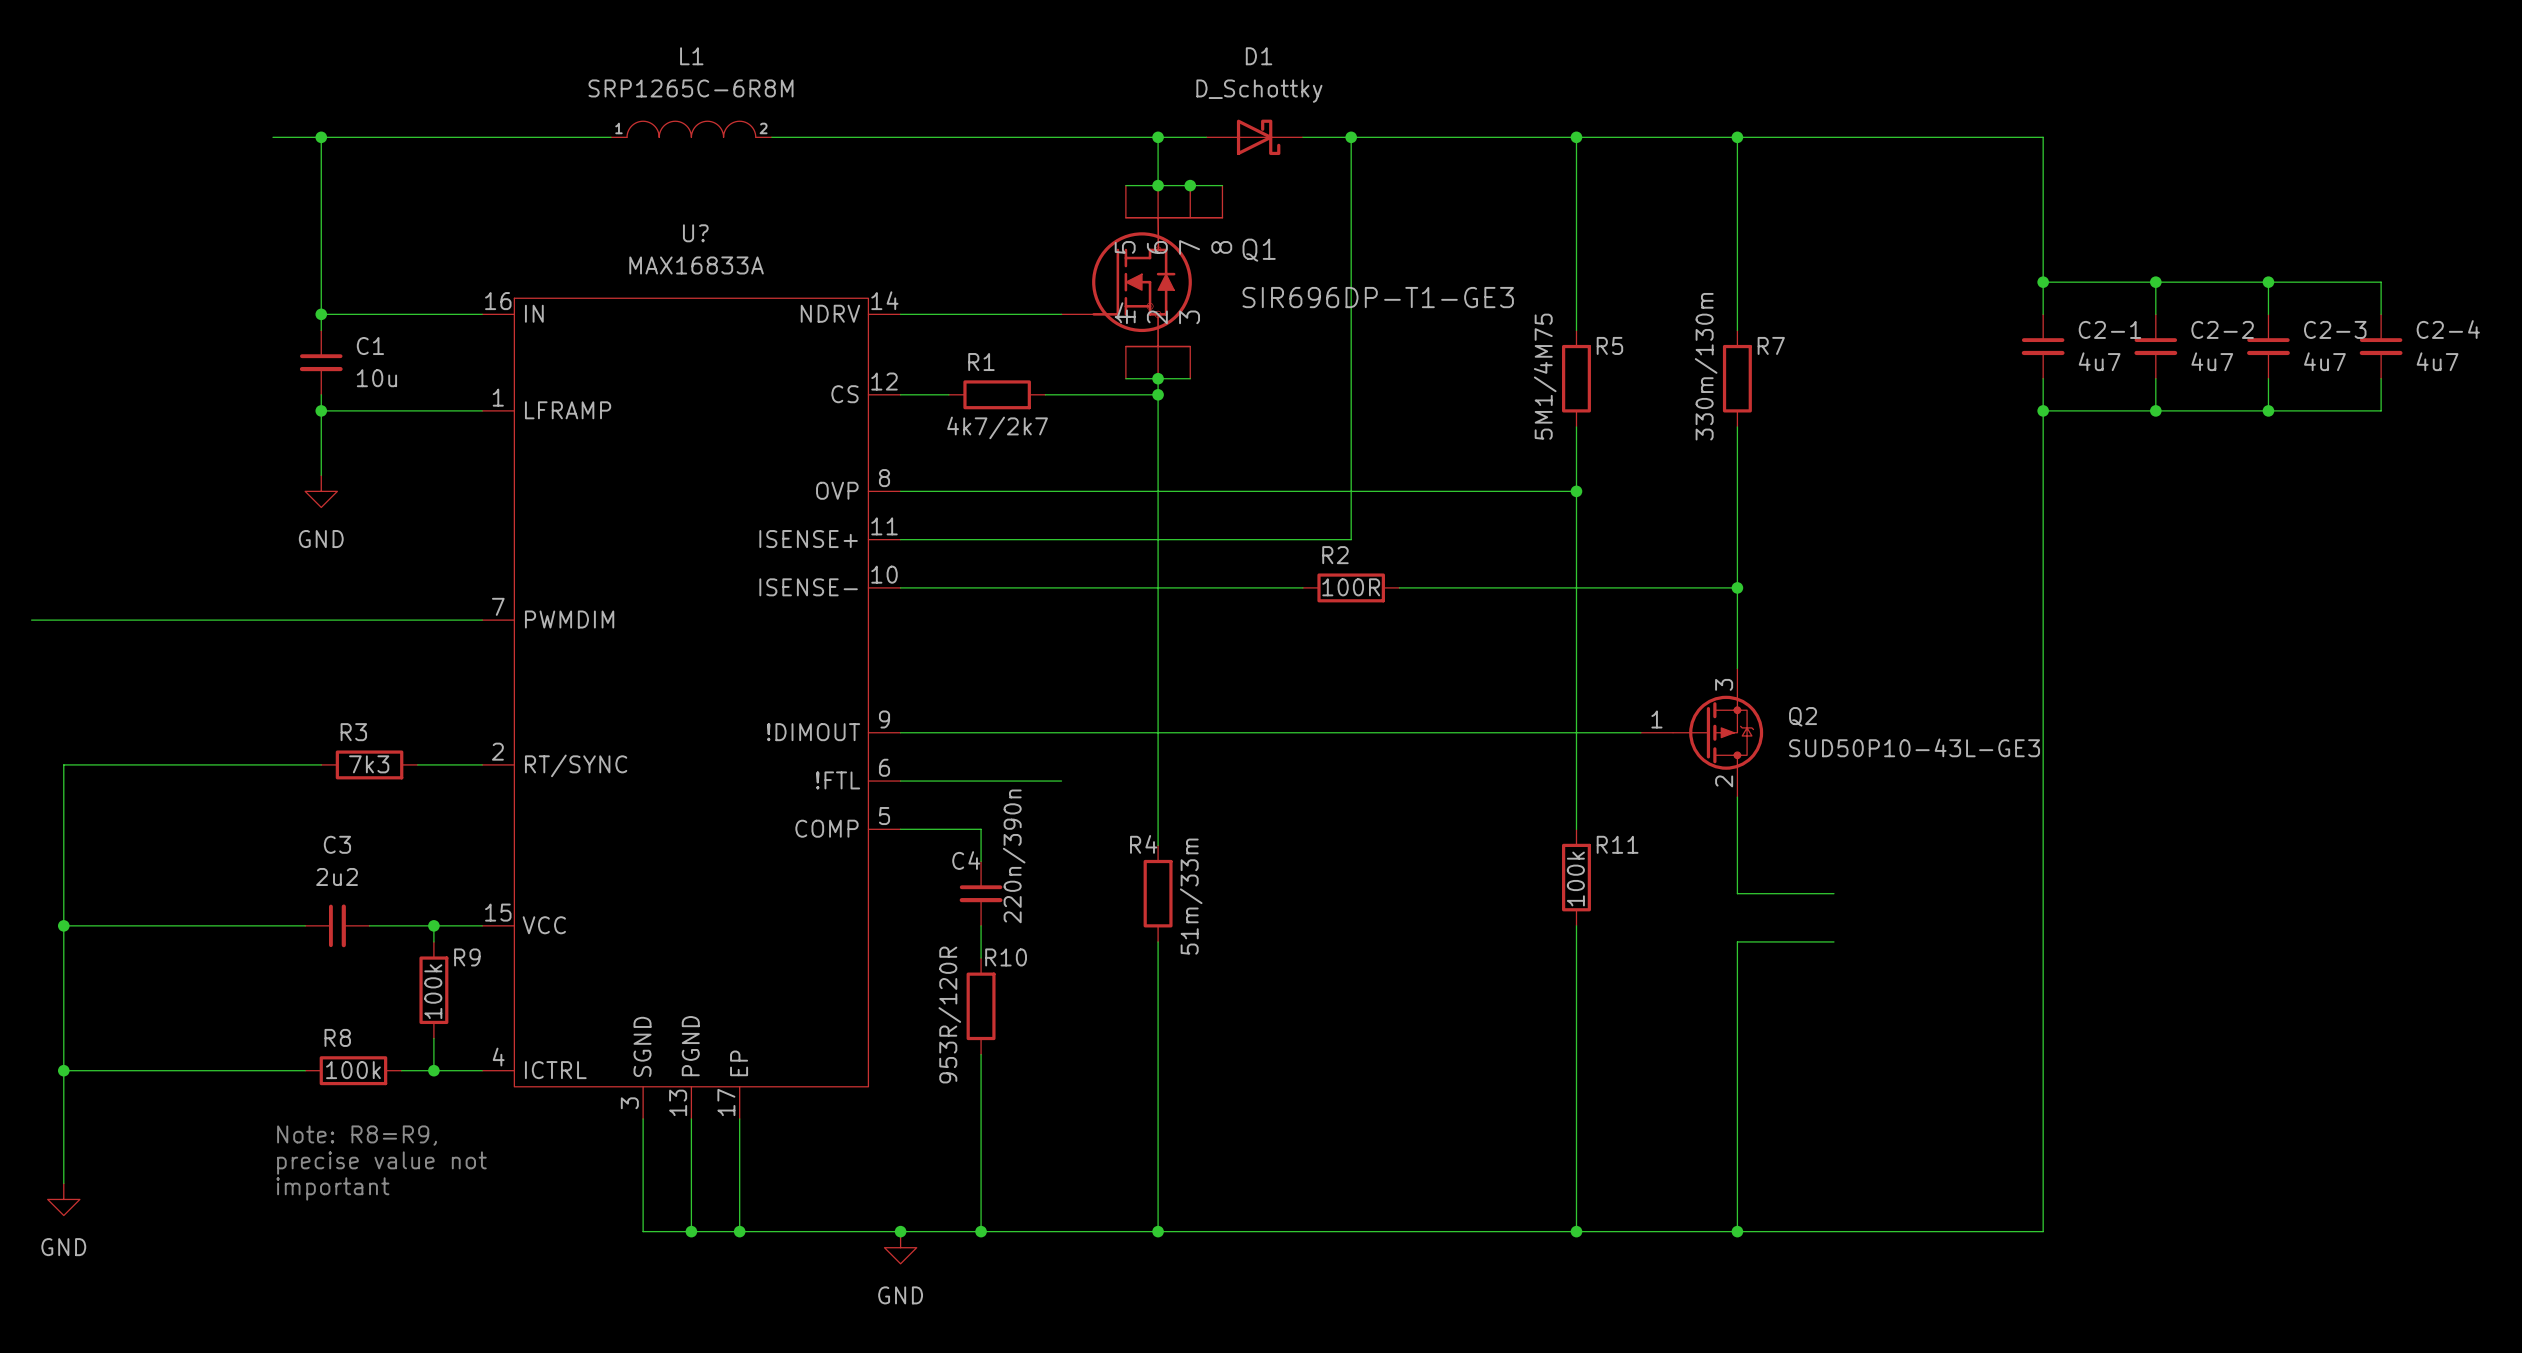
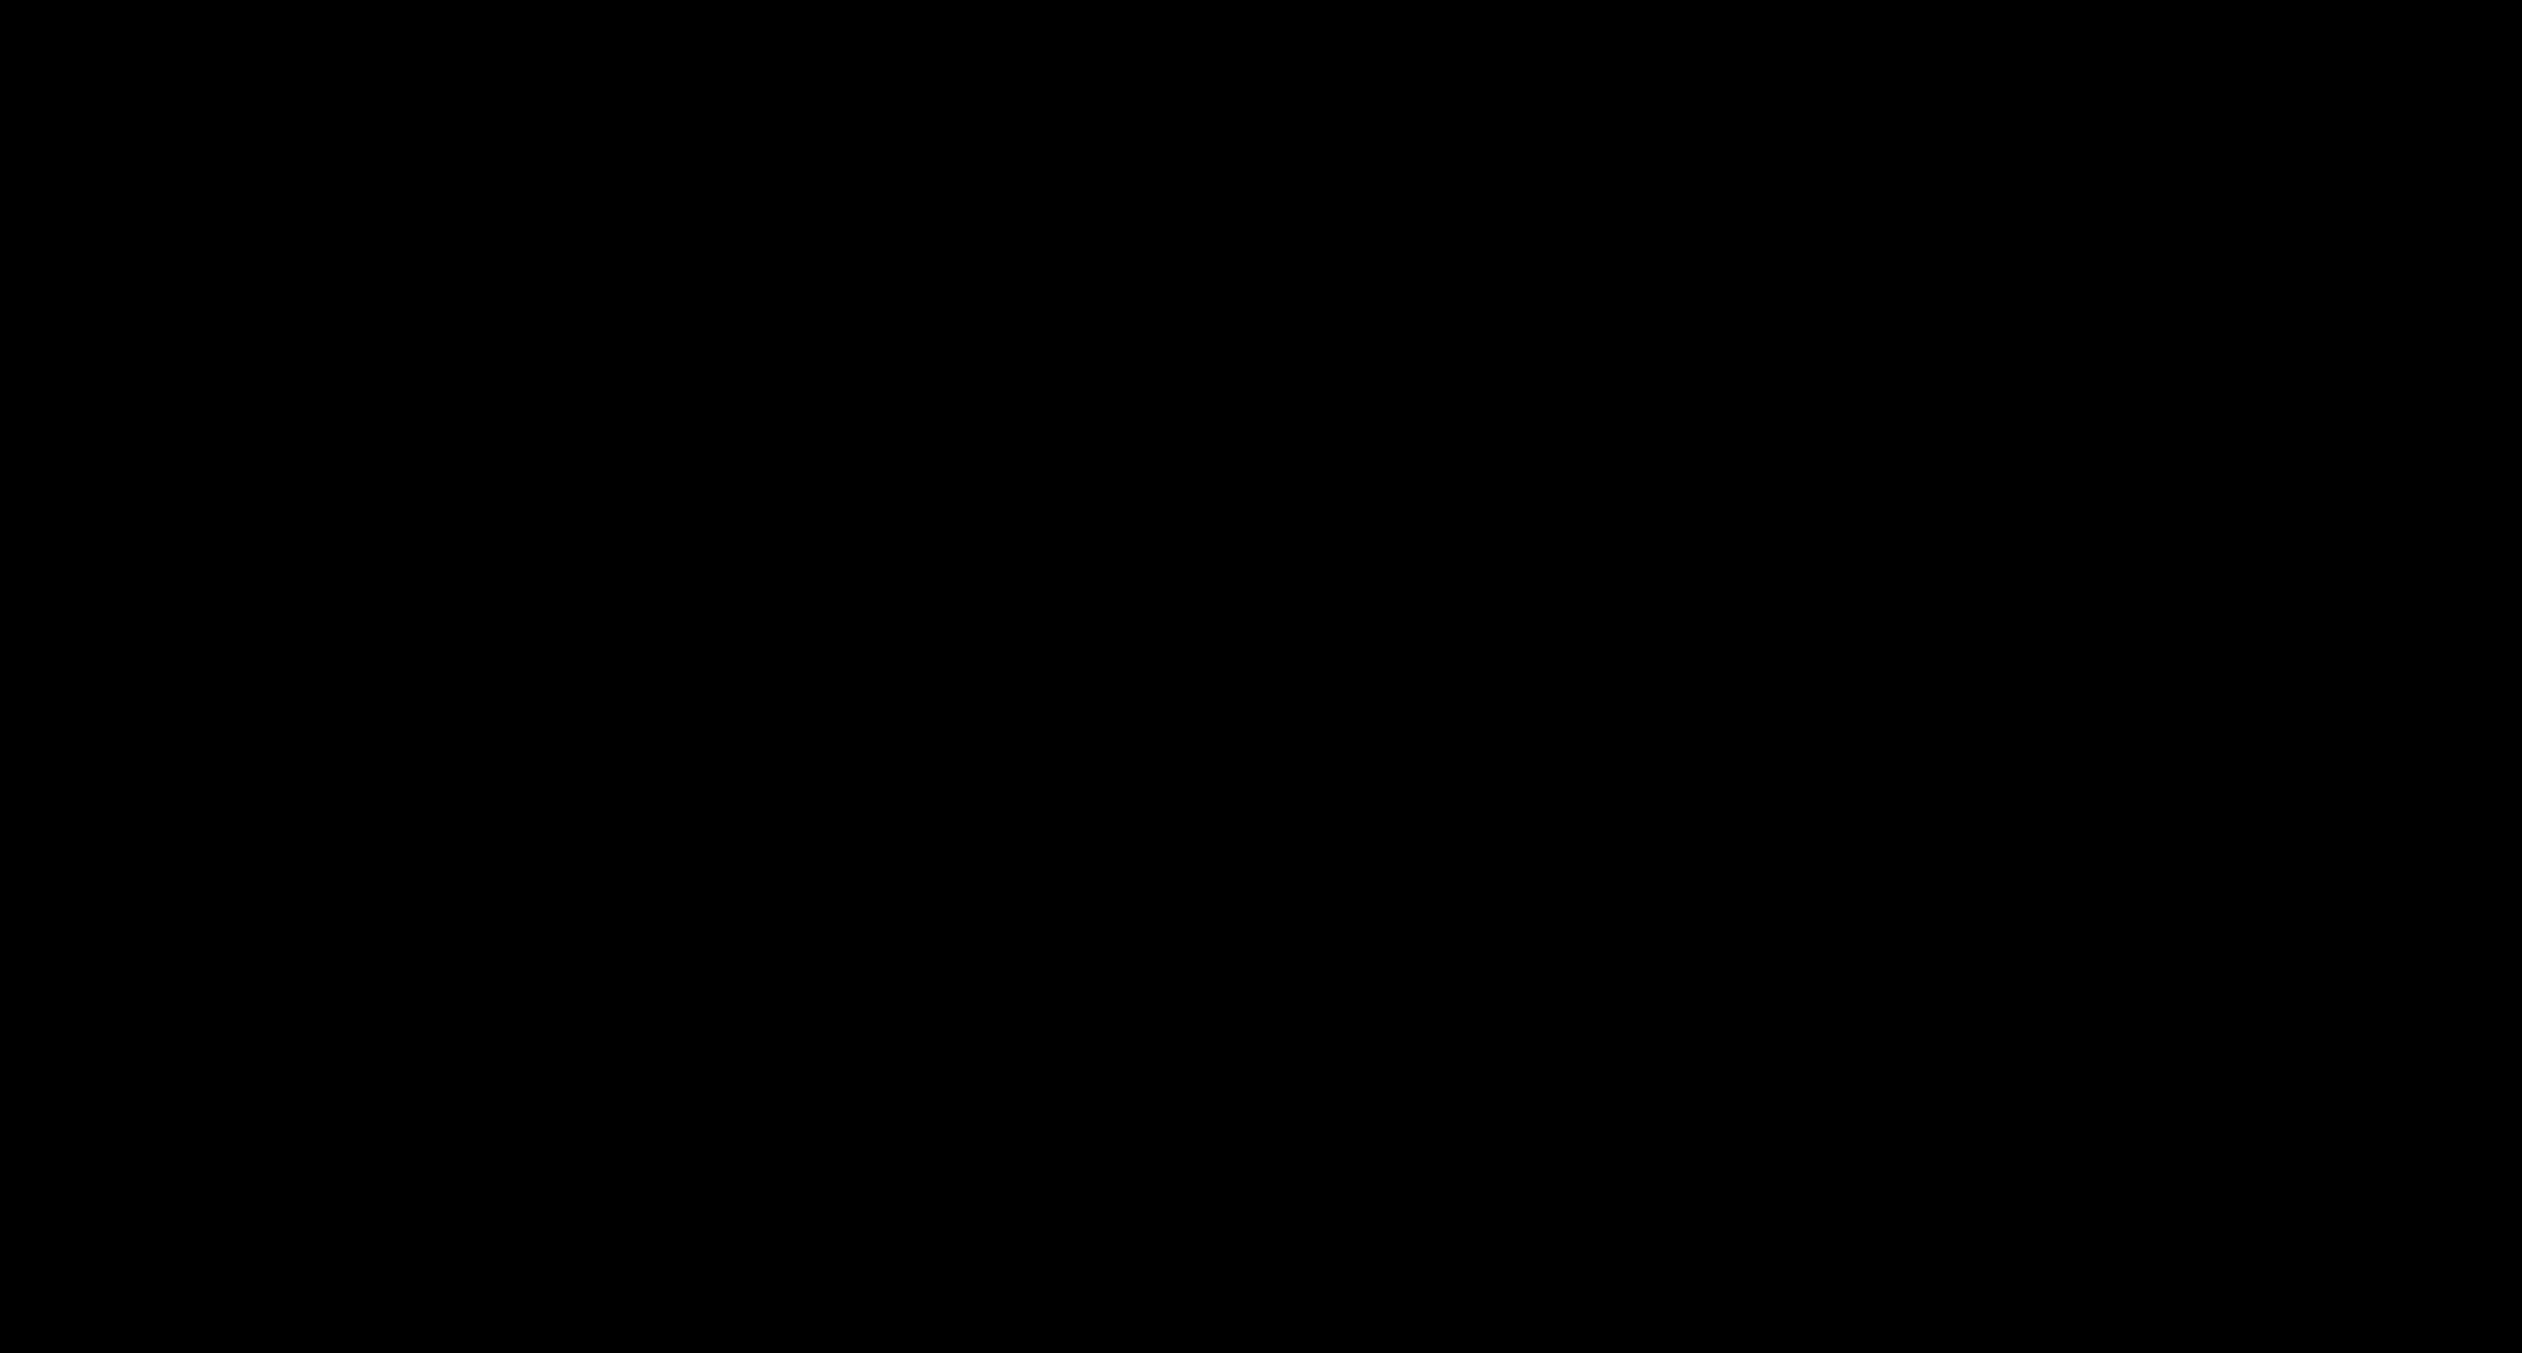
L1: SRP1265C-6R8M (691, 129) -> none
wire: (272, 137) (610, 137) -> none
wire: (321, 137) (321, 330) -> none
junction: (321, 137) -> none
wire: (771, 137) (1206, 137) -> none
wire: (1158, 137) (1158, 185) -> none
junction: (1158, 137) -> none
D1: D_Schottky (1254, 137) -> none
wire: (1302, 137) (2043, 137) (2043, 314) -> none
wire: (1351, 137) (1351, 539) (900, 539) -> none
junction: (1351, 137) -> none
wire: (1576, 137) (1576, 330) -> none
junction: (1576, 137) -> none
wire: (1737, 137) (1737, 330) -> none
junction: (1737, 137) -> none
wire: (1125, 185) (1222, 185) -> none
junction: (1158, 185) -> none
junction: (1190, 185) -> none
Q1: SIR696DP-T1-GE3 (1142, 282) -> none
wire: (2043, 282) (2381, 282) (2381, 314) -> none
junction: (2043, 282) -> none
wire: (2155, 282) (2155, 314) -> none
junction: (2155, 282) -> none
wire: (2268, 282) (2268, 314) -> none
junction: (2268, 282) -> none
wire: (321, 314) (482, 314) -> none
junction: (321, 314) -> none
wire: (900, 314) (1061, 314) -> none
C2-1: 4u7 (2043, 346) -> none
C2-2: 4u7 (2155, 346) -> none
C2-3: 4u7 (2268, 346) -> none
C2-4: 4u7 (2381, 346) -> none
C1: 10u (321, 362) -> none
wire: (1125, 378) (1190, 378) -> none
wire: (1158, 378) (1158, 845) -> none
junction: (1158, 378) -> none
R5: 5M1/4M75 (1576, 378) -> none
R7: 330m/130m (1737, 378) -> none
wire: (2043, 378) (2043, 1231) (643, 1231) (643, 1118) -> none
wire: (2155, 378) (2155, 410) -> none
wire: (2268, 378) (2268, 410) -> none
wire: (2381, 378) (2381, 410) (2043, 410) -> none
wire: (321, 394) (321, 475) -> none
wire: (900, 394) (948, 394) -> none
R1: 4k7/2k7 (997, 394) -> none
wire: (1045, 394) (1158, 394) -> none
junction: (1158, 394) -> none
wire: (321, 410) (482, 410) -> none
junction: (321, 410) -> none
junction: (2043, 410) -> none
junction: (2155, 410) -> none
junction: (2268, 410) -> none
wire: (1576, 426) (1576, 829) -> none
wire: (1737, 426) (1737, 668) -> none
power symbol: GND (321, 491) -> none
wire: (900, 491) (1576, 491) -> none
junction: (1576, 491) -> none
wire: (900, 587) (1302, 587) -> none
R2: 100R (1351, 587) -> none
wire: (1399, 587) (1737, 587) -> none
junction: (1737, 587) -> none
wire: (31, 620) (482, 620) -> none
U?: MAX16833A (691, 708) -> none
wire: (900, 732) (1640, 732) -> none
Q2: SUD50P10-43L-GE3 (1702, 732) -> none
wire: (321, 764) (63, 764) (63, 1183) -> none
R3: 7k3 (369, 764) -> none
wire: (417, 764) (482, 764) -> none
wire: (900, 781) (1061, 781) -> none
wire: (1737, 797) (1737, 893) (1833, 893) -> none
wire: (900, 829) (981, 829) (981, 861) -> none
R11: 100k (1576, 877) -> none
C4: 220n/390n (981, 893) -> none
R4: 51m/33m (1158, 893) -> none
wire: (63, 925) (305, 925) -> none
junction: (63, 925) -> none
C3: 2u2 (337, 925) -> none
wire: (369, 925) (482, 925) -> none
wire: (433, 925) (433, 941) -> none
junction: (433, 925) -> none
wire: (981, 925) (981, 958) -> none
wire: (1576, 925) (1576, 1231) -> none
wire: (1158, 941) (1158, 1231) -> none
wire: (1833, 941) (1737, 941) (1737, 1231) -> none
R9: 100k (433, 990) -> none
R10: 953R/120R (981, 1006) -> none
wire: (433, 1038) (433, 1070) -> none
wire: (981, 1054) (981, 1231) -> none
wire: (63, 1070) (305, 1070) -> none
junction: (63, 1070) -> none
R8: 100k (353, 1070) -> none
wire: (401, 1070) (482, 1070) -> none
junction: (433, 1070) -> none
wire: (691, 1118) (691, 1231) -> none
wire: (739, 1118) (739, 1231) -> none
text: Note: R8=R9, (357, 1135) -> none
text: precise value not (381, 1163) -> none
text: important (332, 1188) -> none
power symbol: GND (63, 1199) -> none
junction: (691, 1231) -> none
junction: (739, 1231) -> none
junction: (900, 1231) -> none
junction: (981, 1231) -> none
junction: (1158, 1231) -> none
junction: (1576, 1231) -> none
junction: (1737, 1231) -> none
power symbol: GND (900, 1247) -> none

